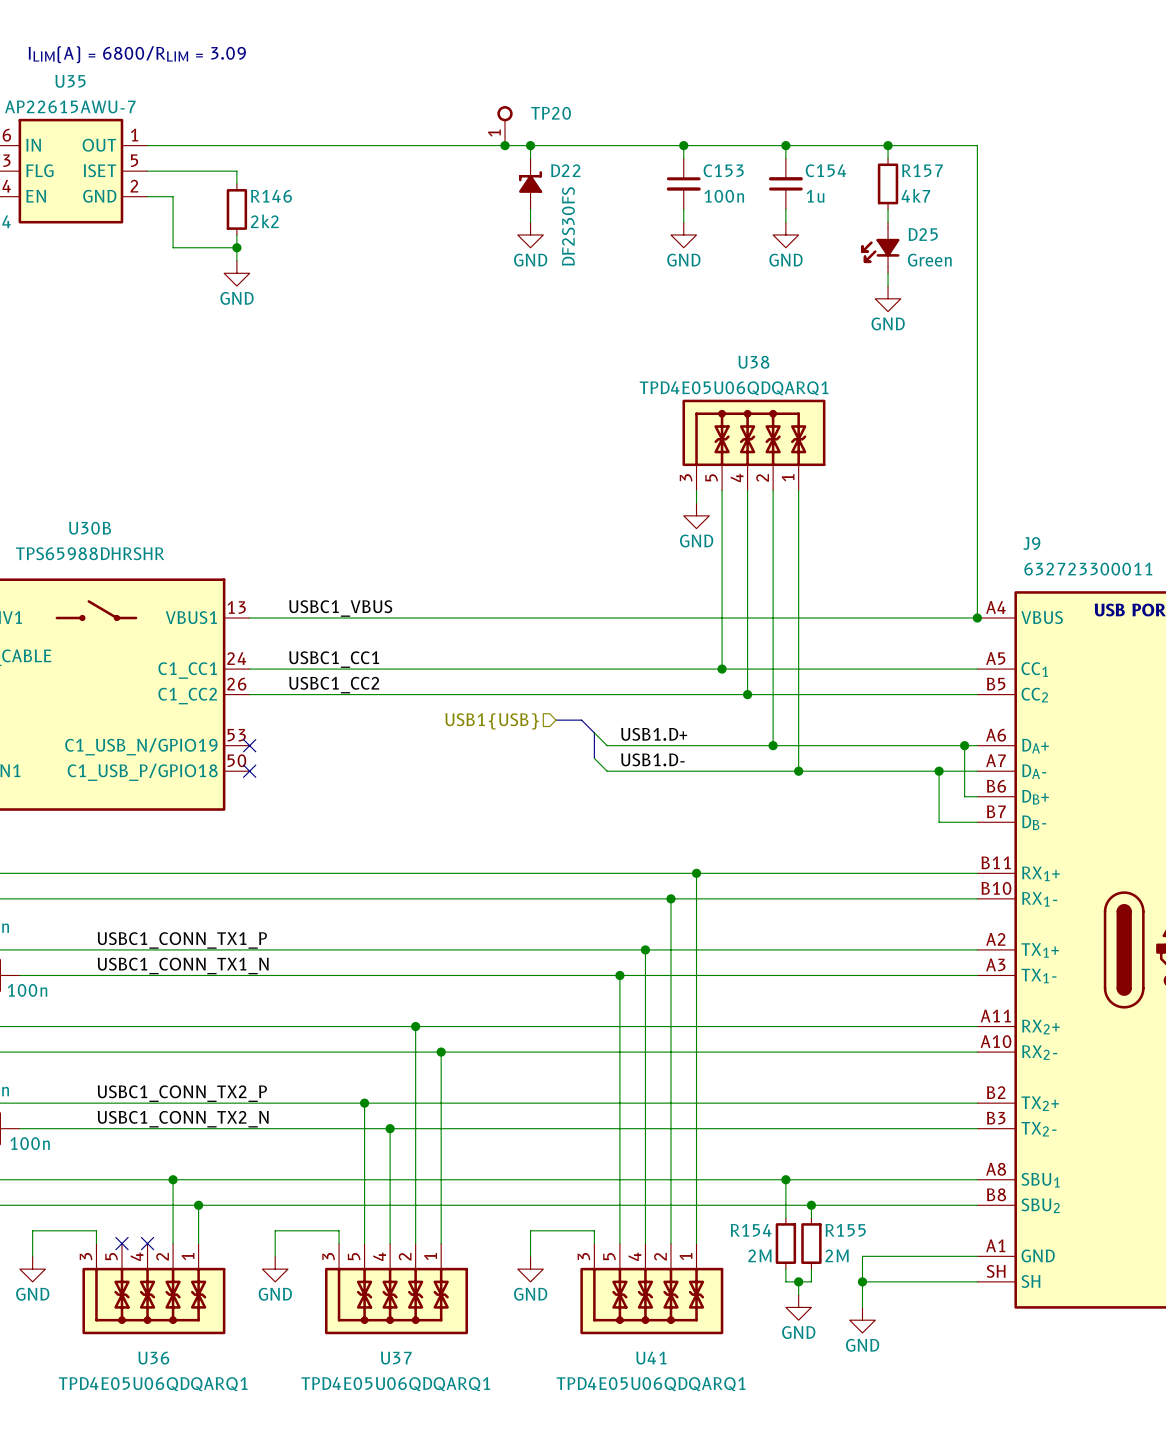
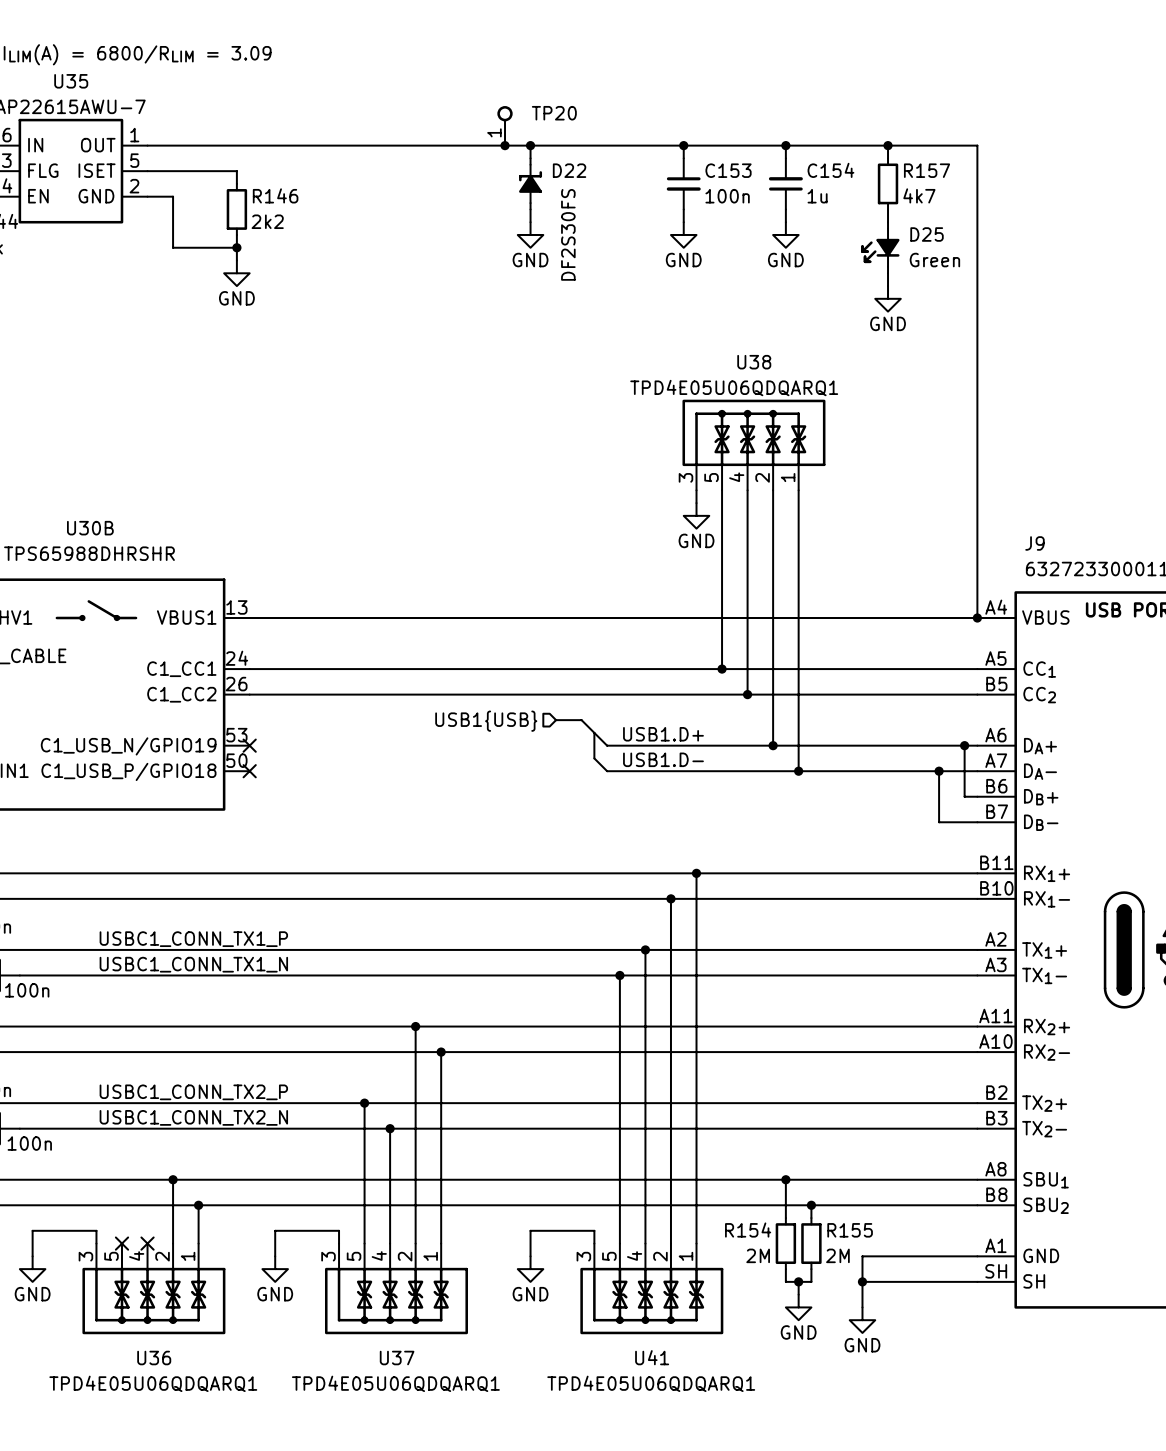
label: USBC1_VBUS (340, 608) -> none
label: USBC1_CC1 (334, 659) -> none
label: USBC1_CC2 (334, 685) -> none

